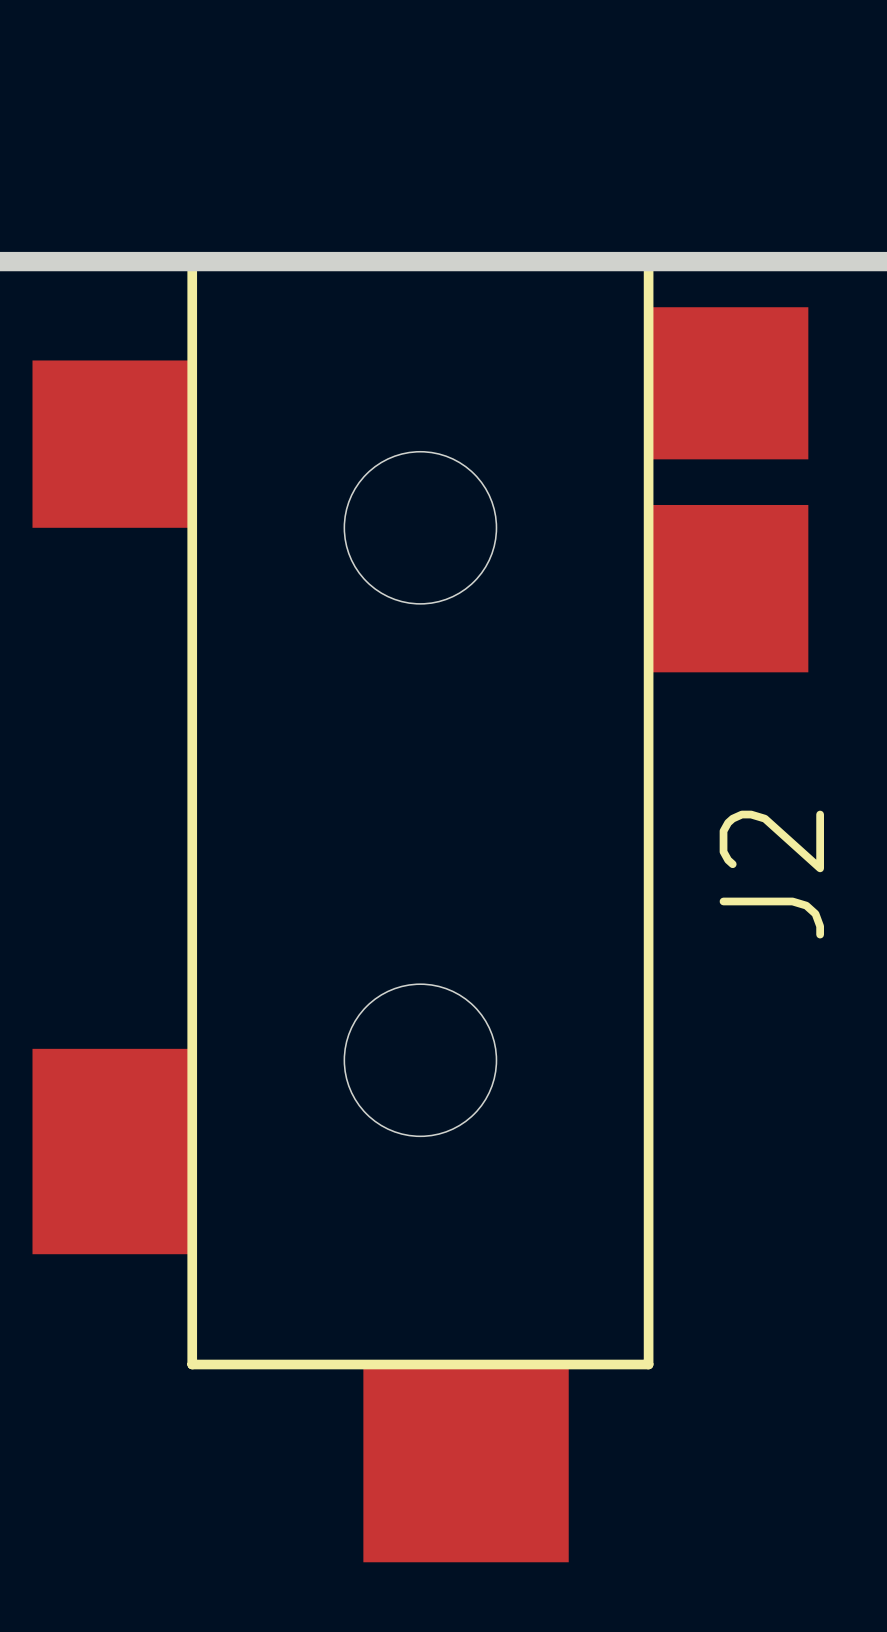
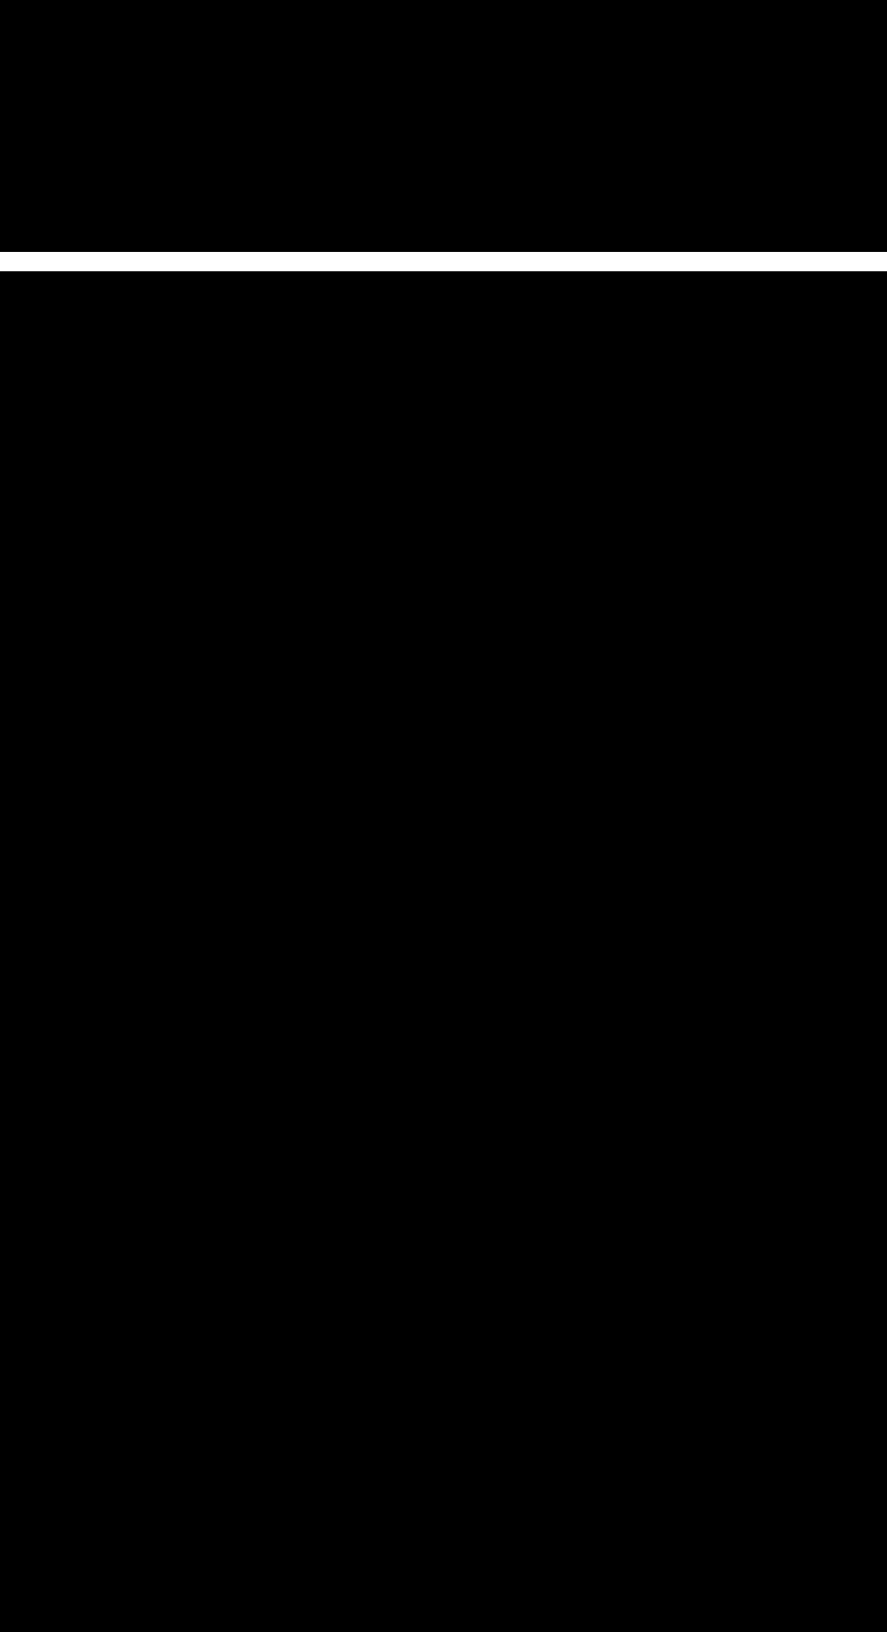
J2: (420, 909) -> none

